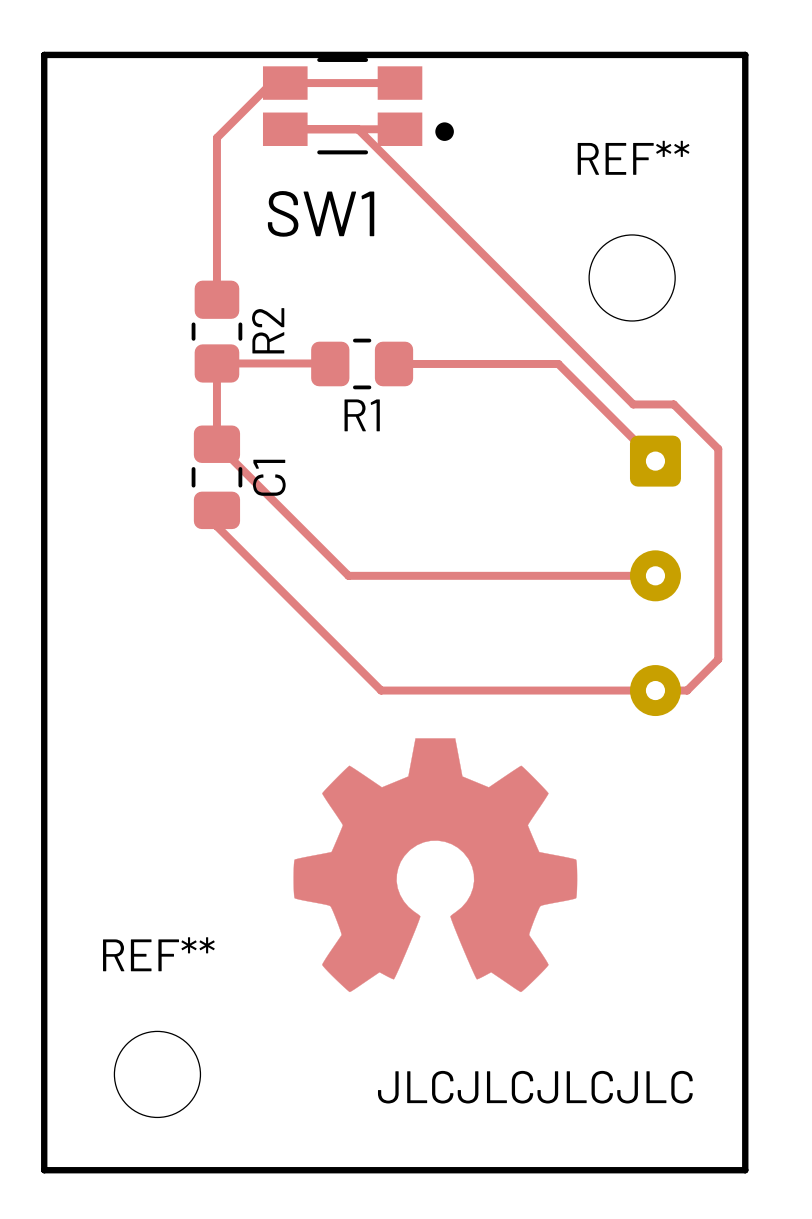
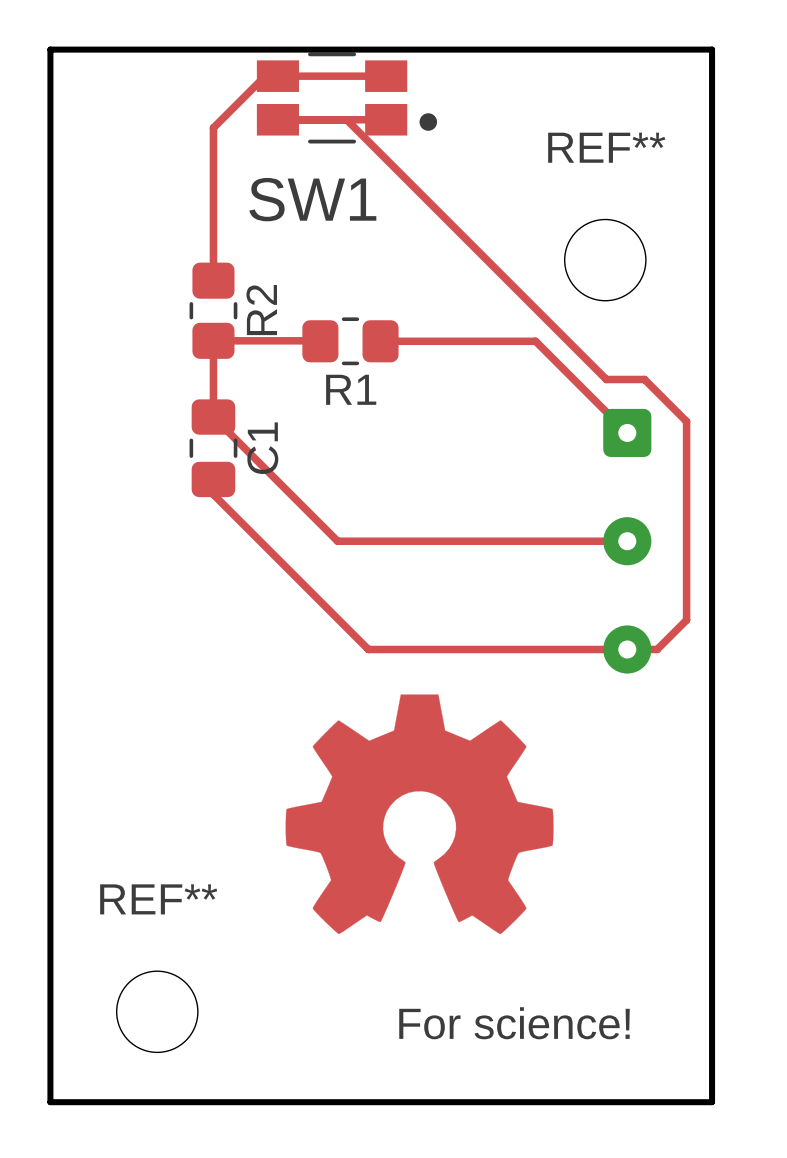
text: JLCJLCJLCJLC (535, 1087) -> For science! (514, 1023)

